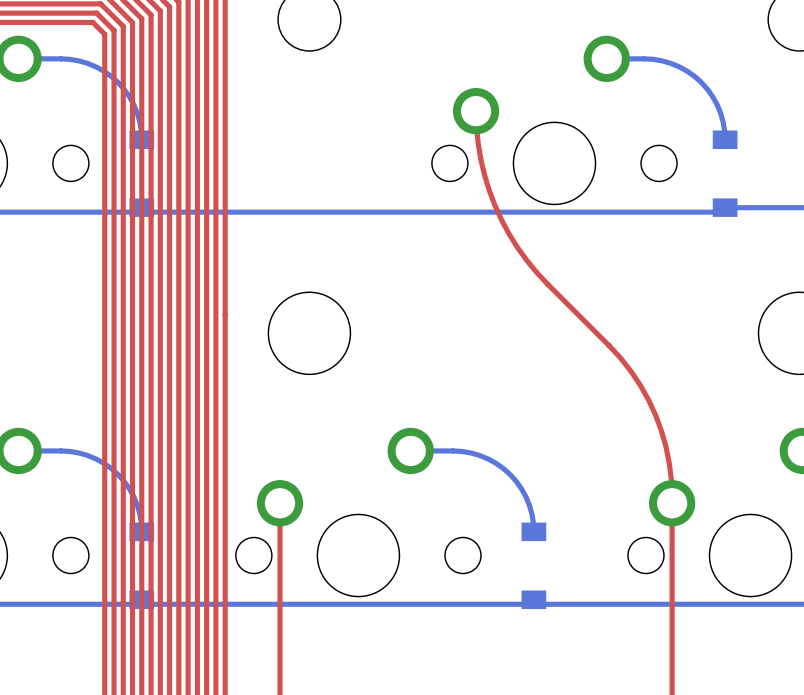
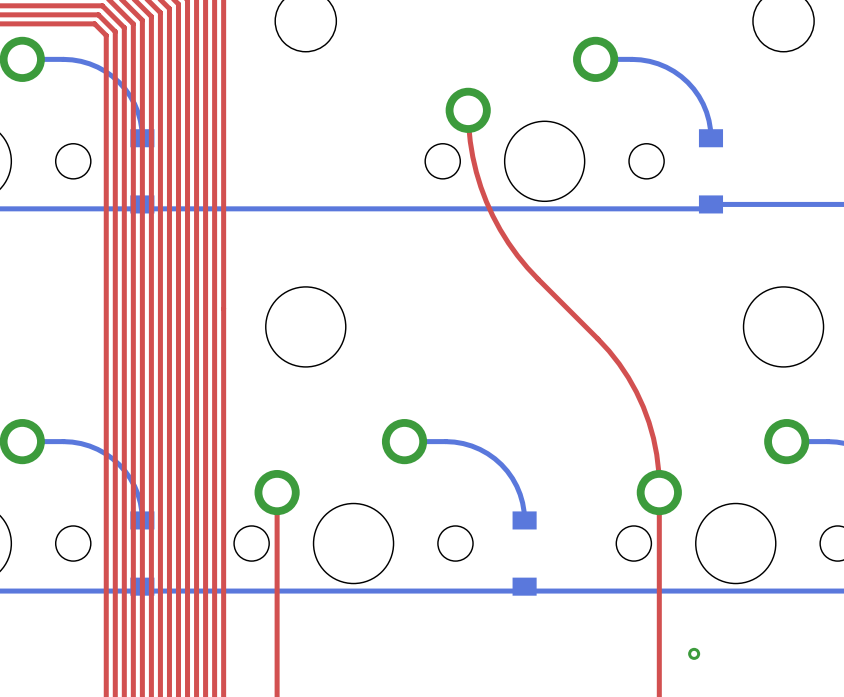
via: none -> (694, 653)

